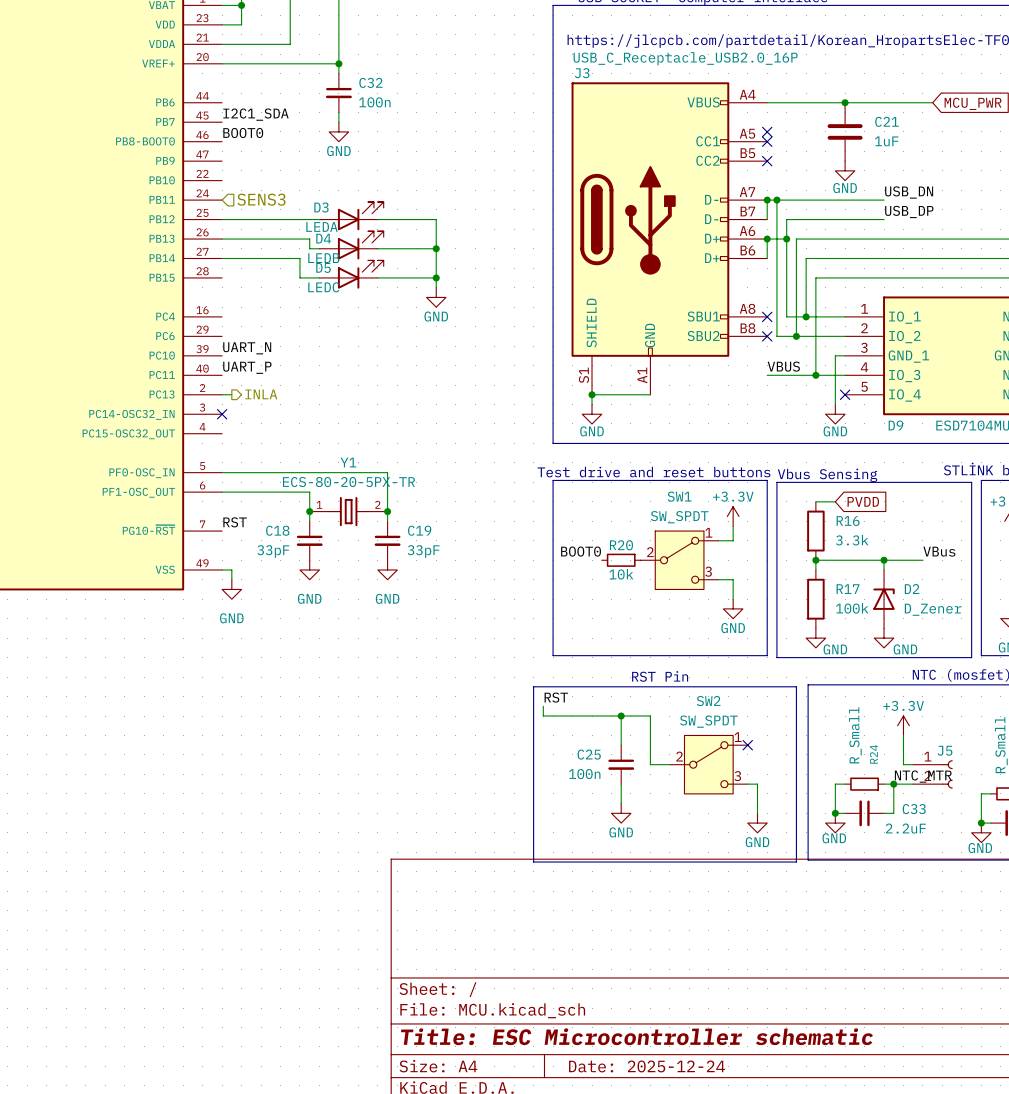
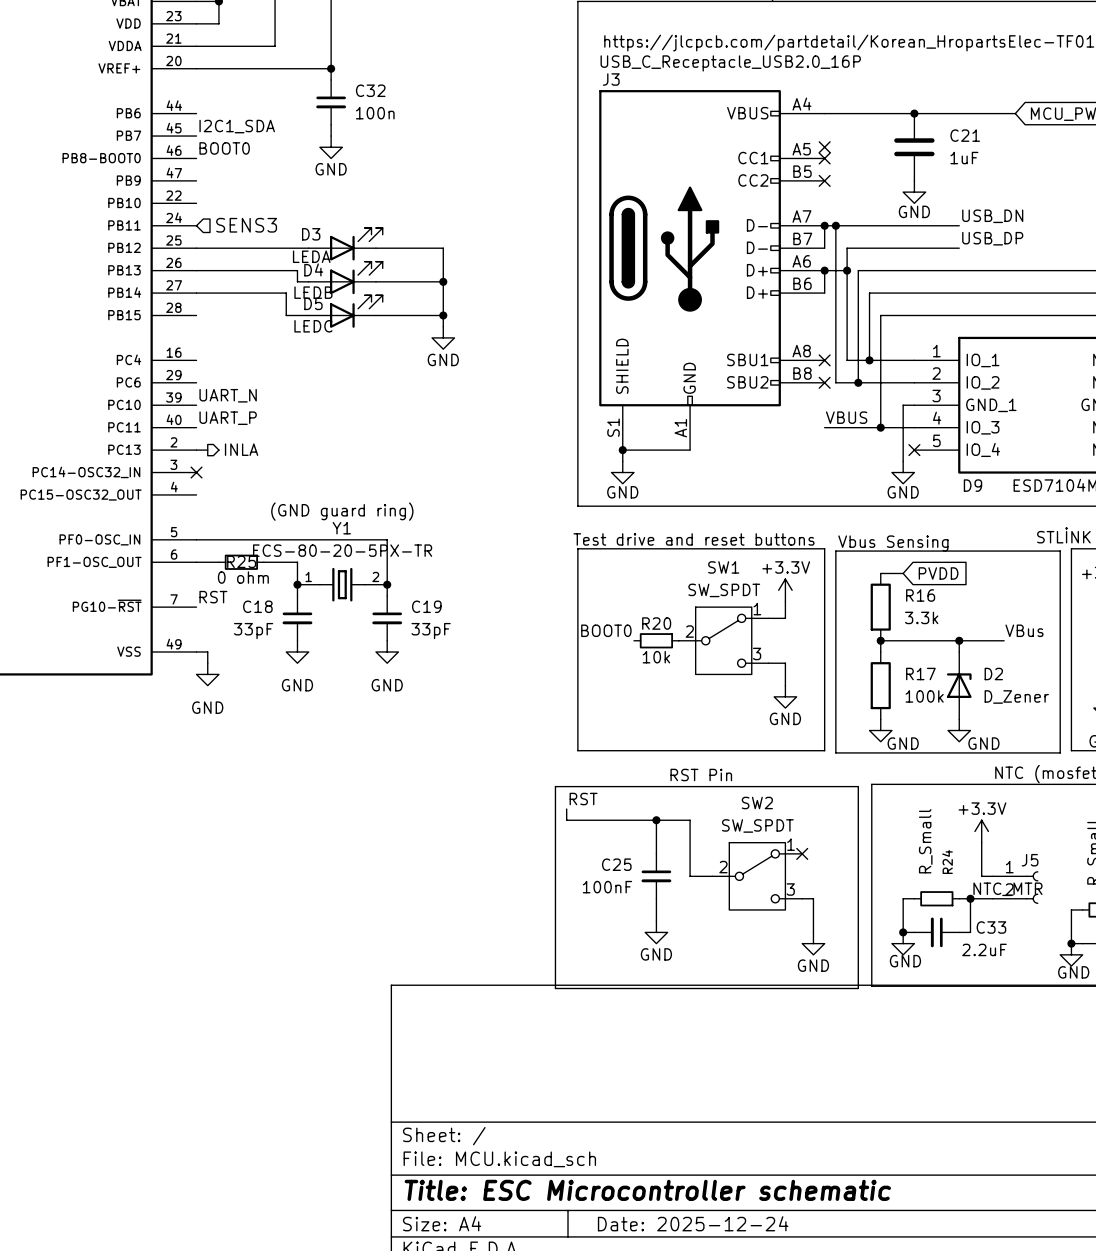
text: none -> (GND guard ring) (342, 511)
R25: none -> 0 ohm (241, 562)
C25 value: 100n (584, 774) -> 100nF (607, 887)

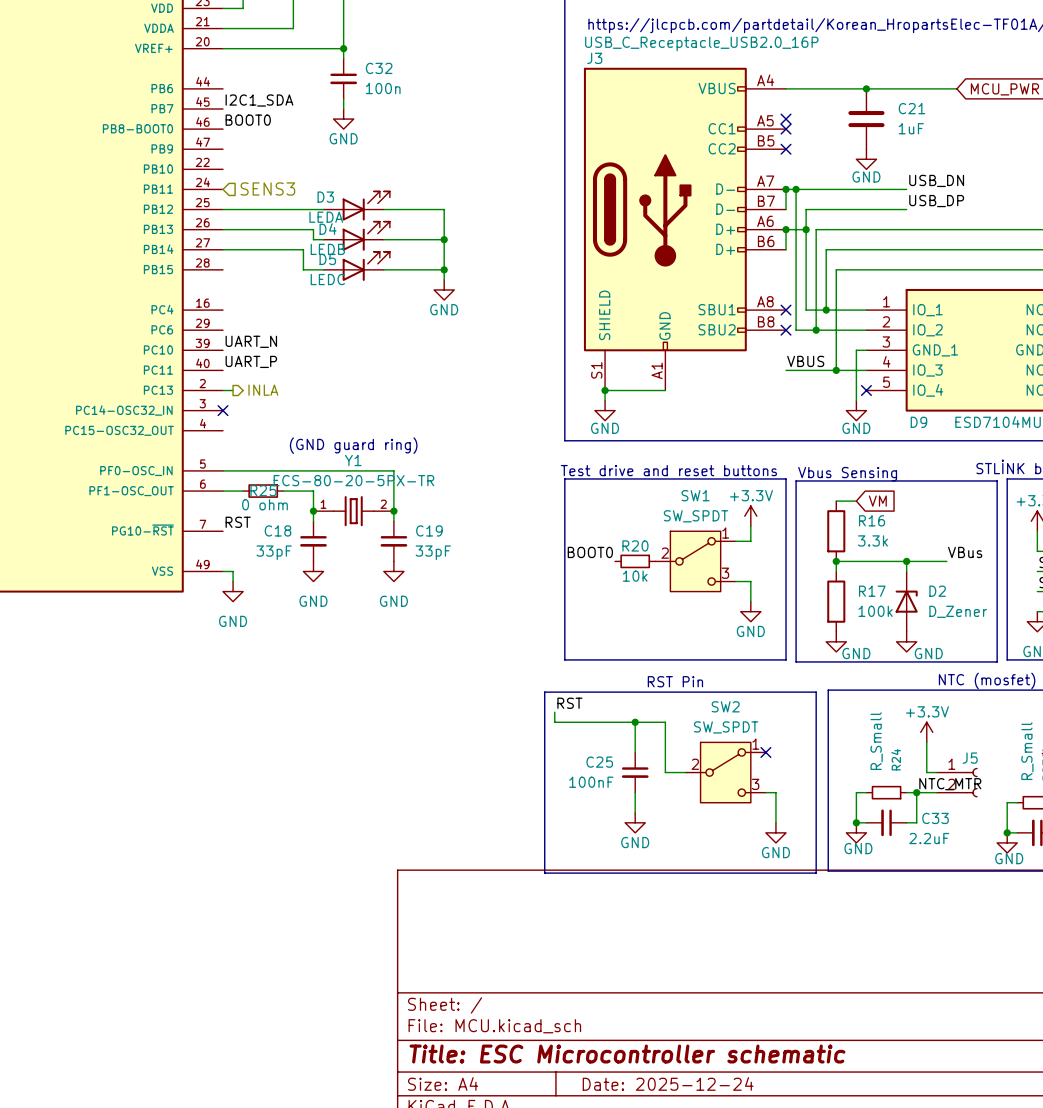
global label: PVDD (938, 573) -> VM (877, 501)

